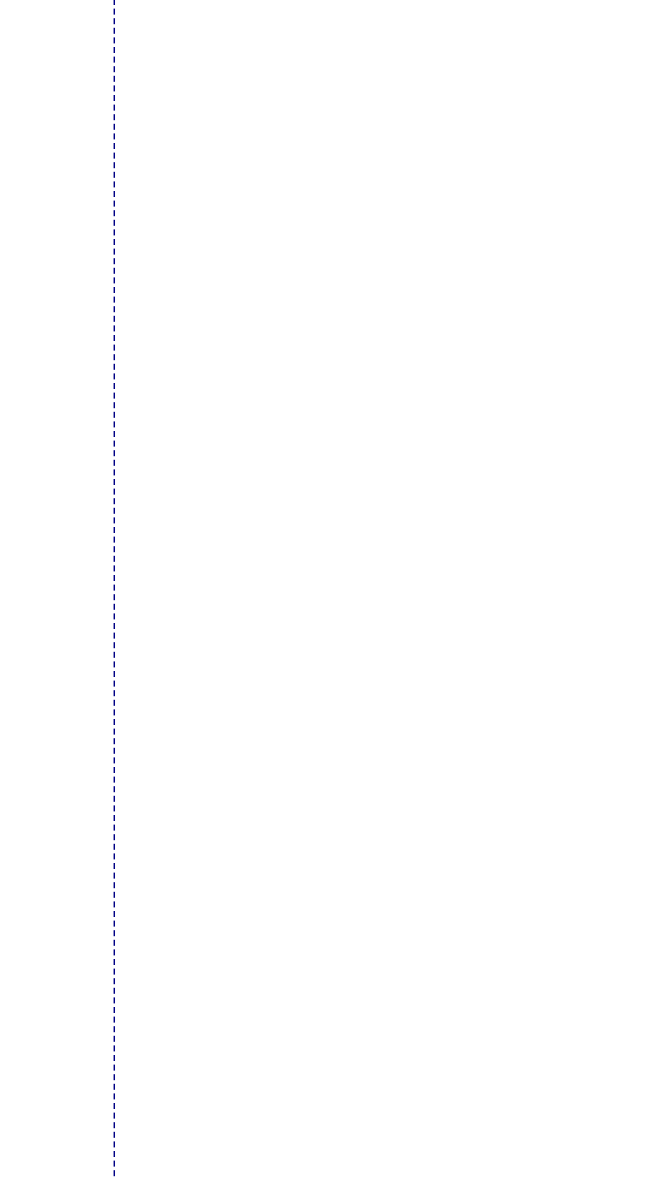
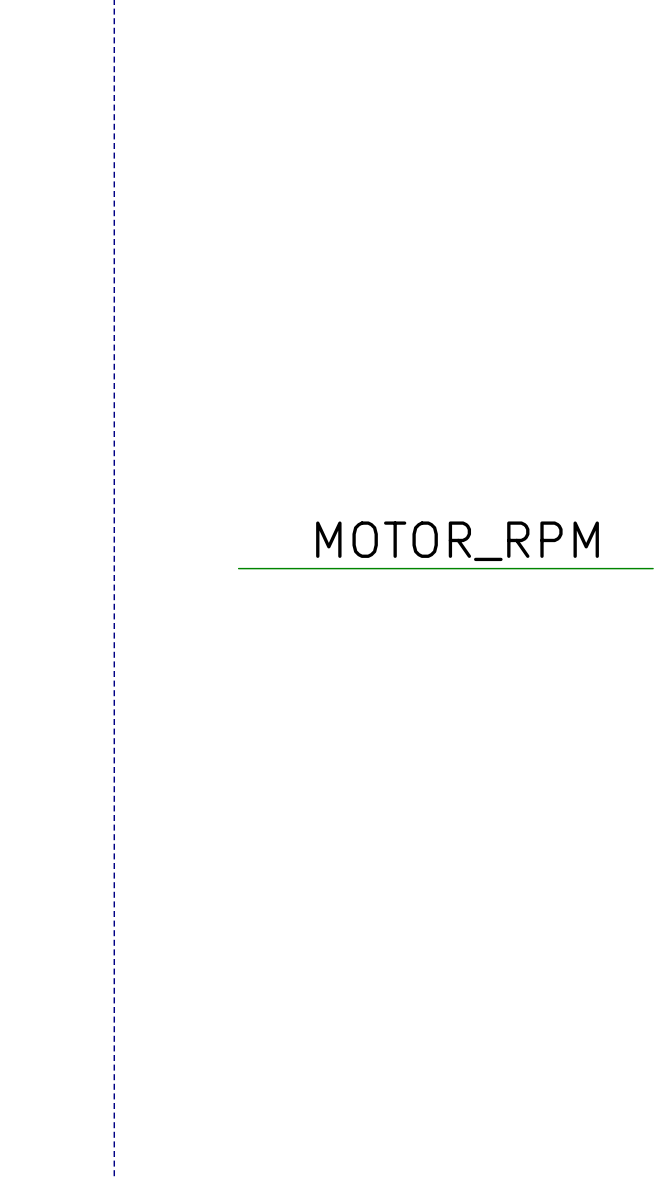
label: none -> MOTOR_RPM (457, 541)
wire: none -> (238, 568) (653, 568)

